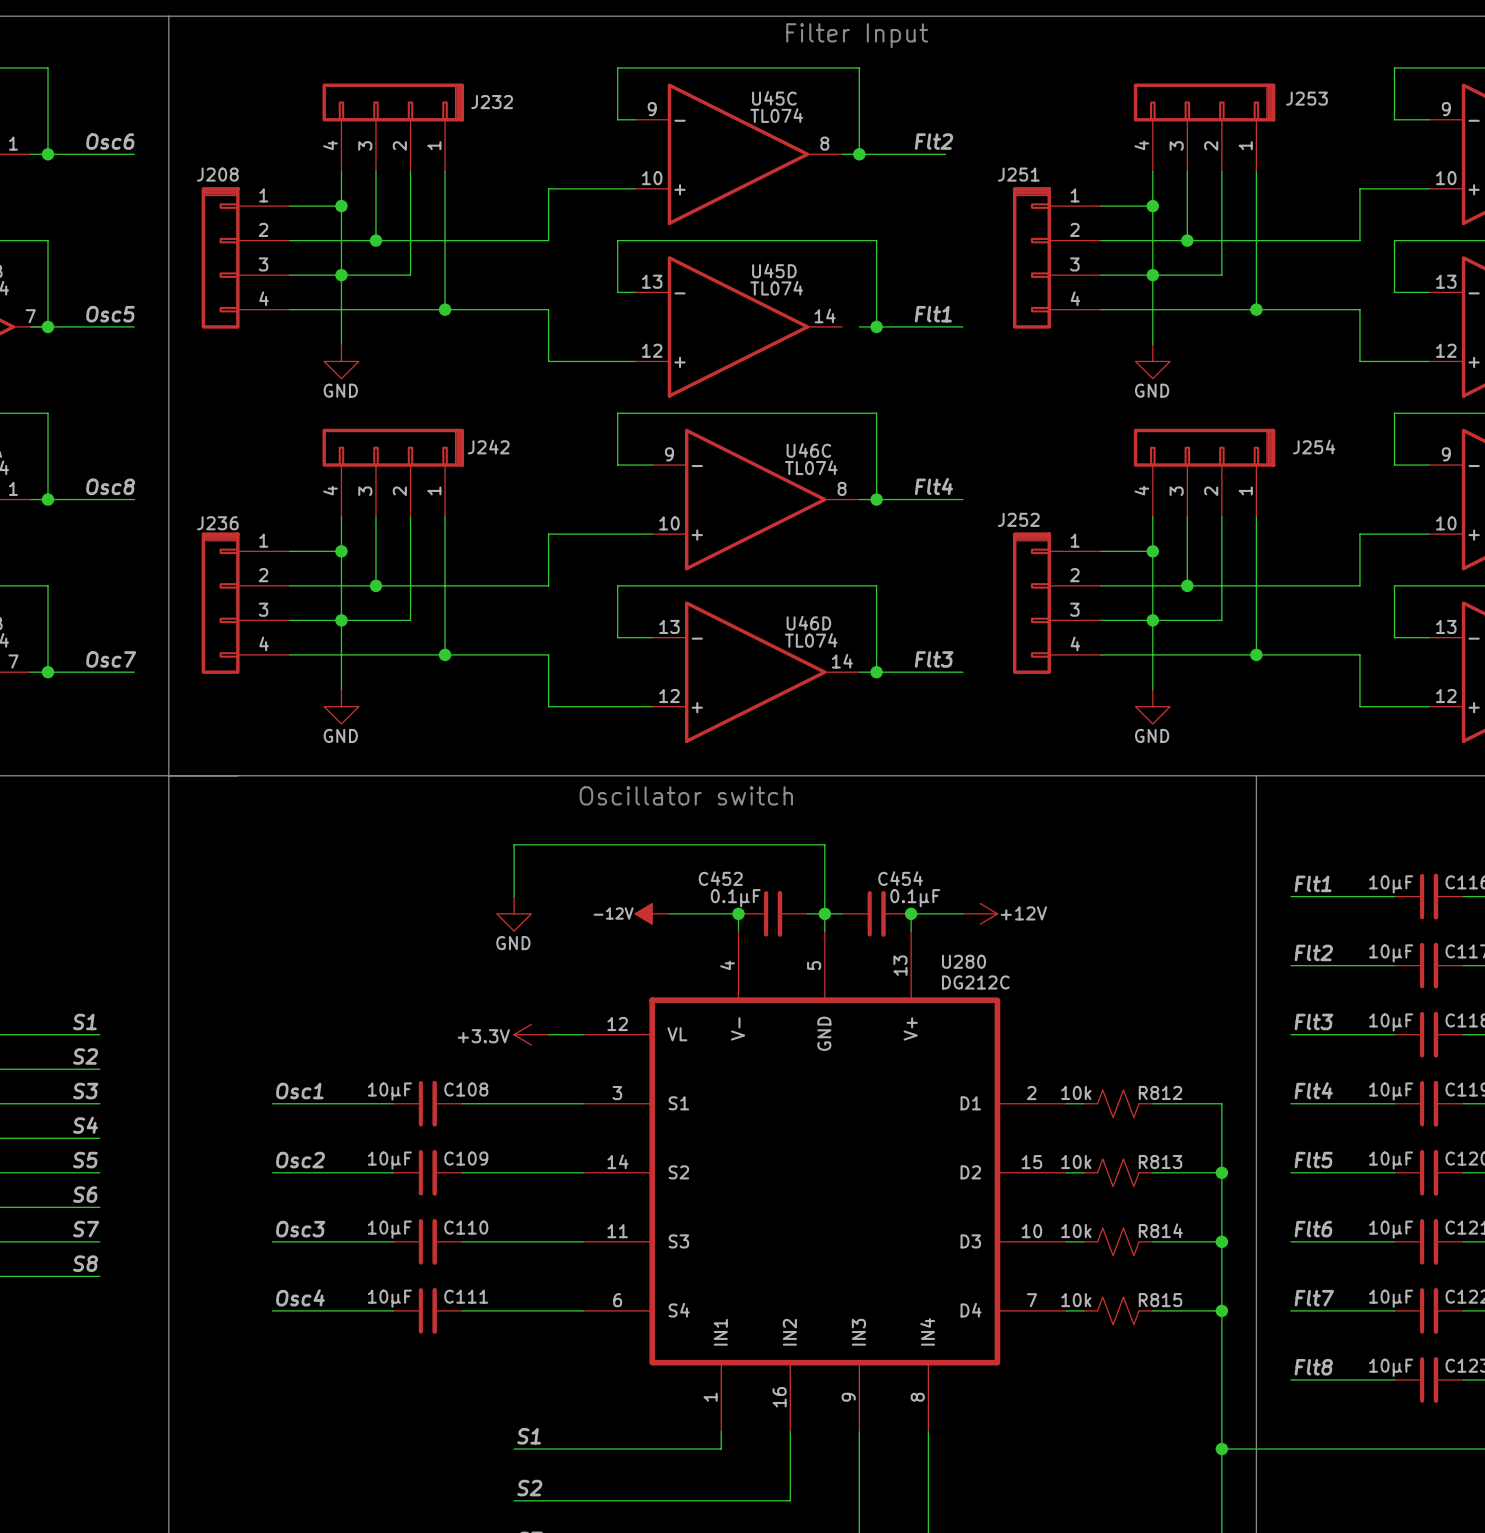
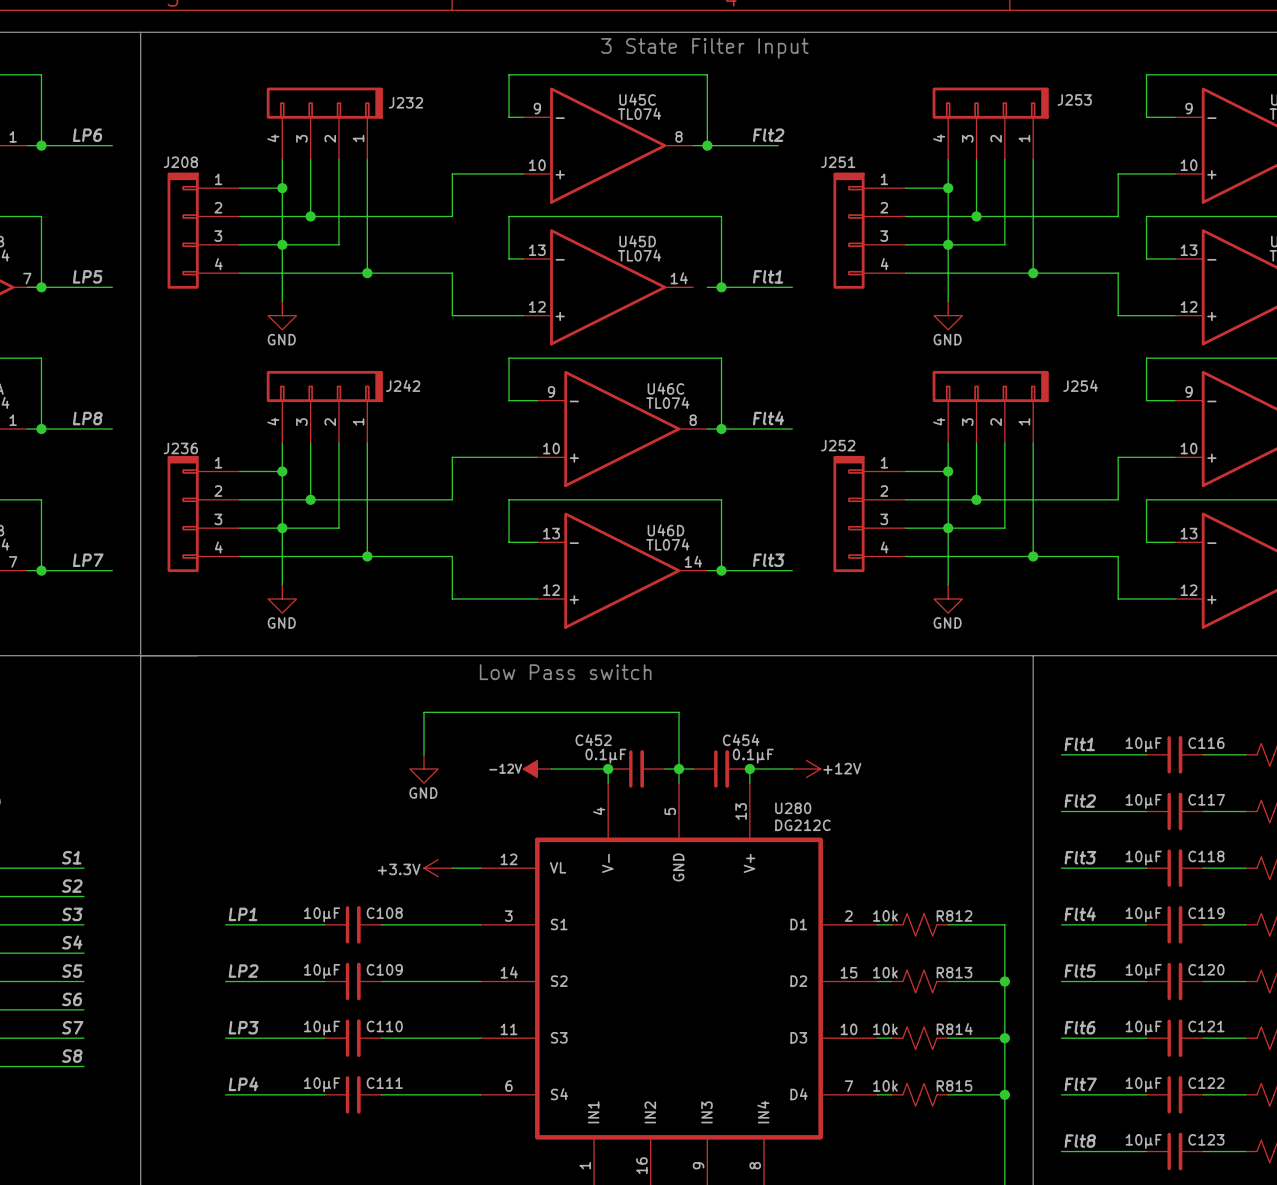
text: Filter Input (857, 35) -> 3 State Filter Input (704, 48)
label: Osc6 (110, 141) -> LP6 (87, 135)
label: Osc5 (110, 314) -> LP5 (87, 276)
label: Osc8 (110, 486) -> LP8 (87, 418)
label: Osc7 (111, 659) -> LP7 (88, 560)
text: Oscillator switch (686, 795) -> Low Pass switch (565, 672)
label: Osc1 (299, 1091) -> LP1 (243, 914)
label: Osc2 (300, 1160) -> LP2 (243, 971)
label: Osc3 (300, 1229) -> LP3 (243, 1027)
label: Osc4 (300, 1297) -> LP4 (243, 1084)

